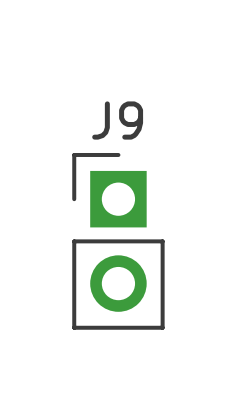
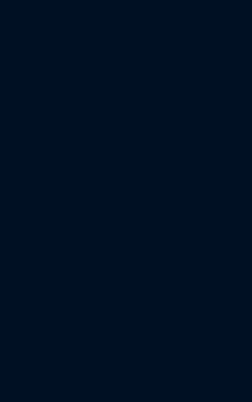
J9: (118, 241) -> none

